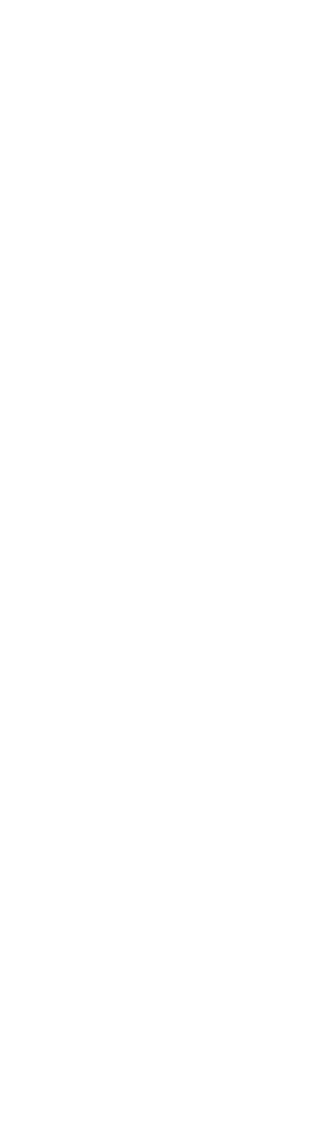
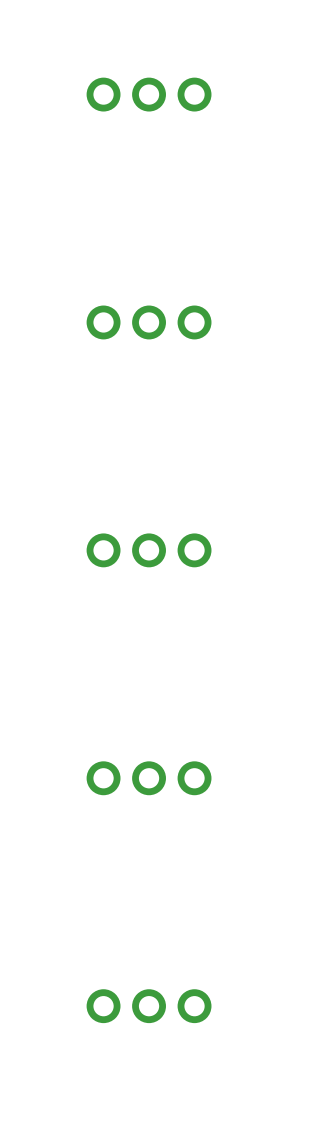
part: none -> (149, 94)
part: none -> (149, 322)
part: none -> (149, 550)
part: none -> (149, 778)
part: none -> (149, 1006)

